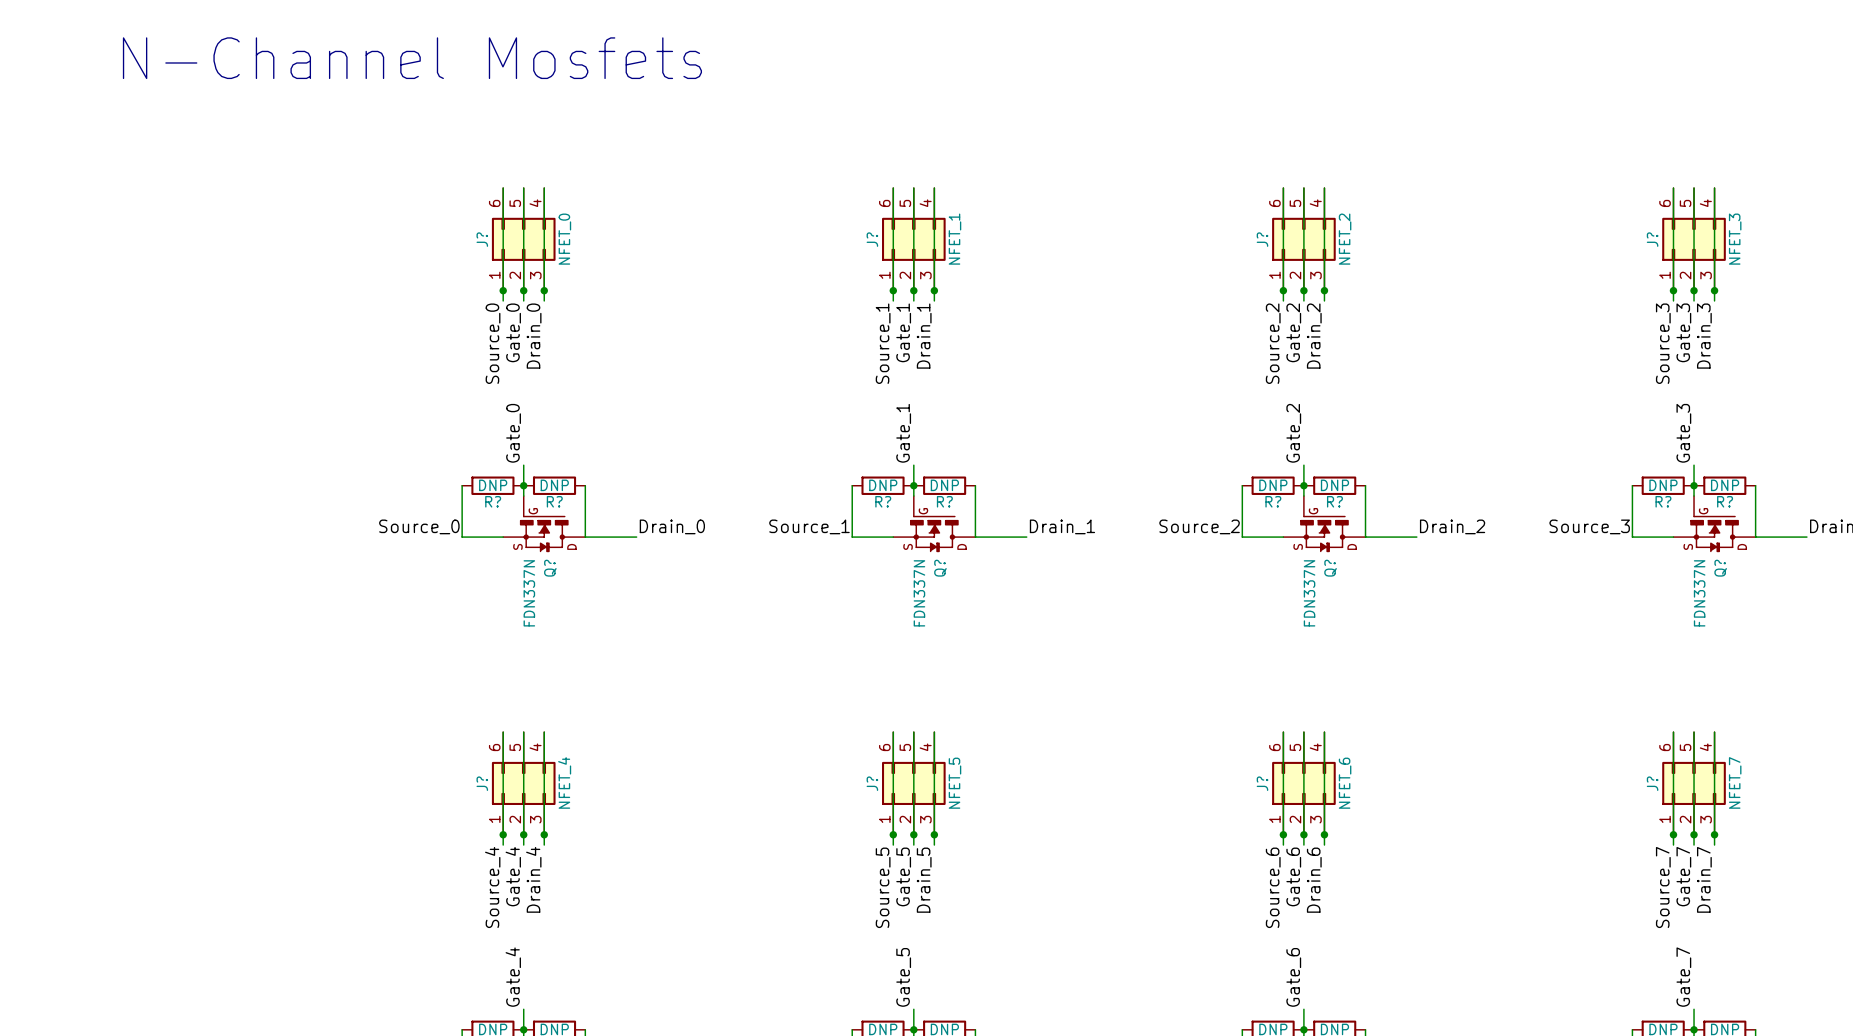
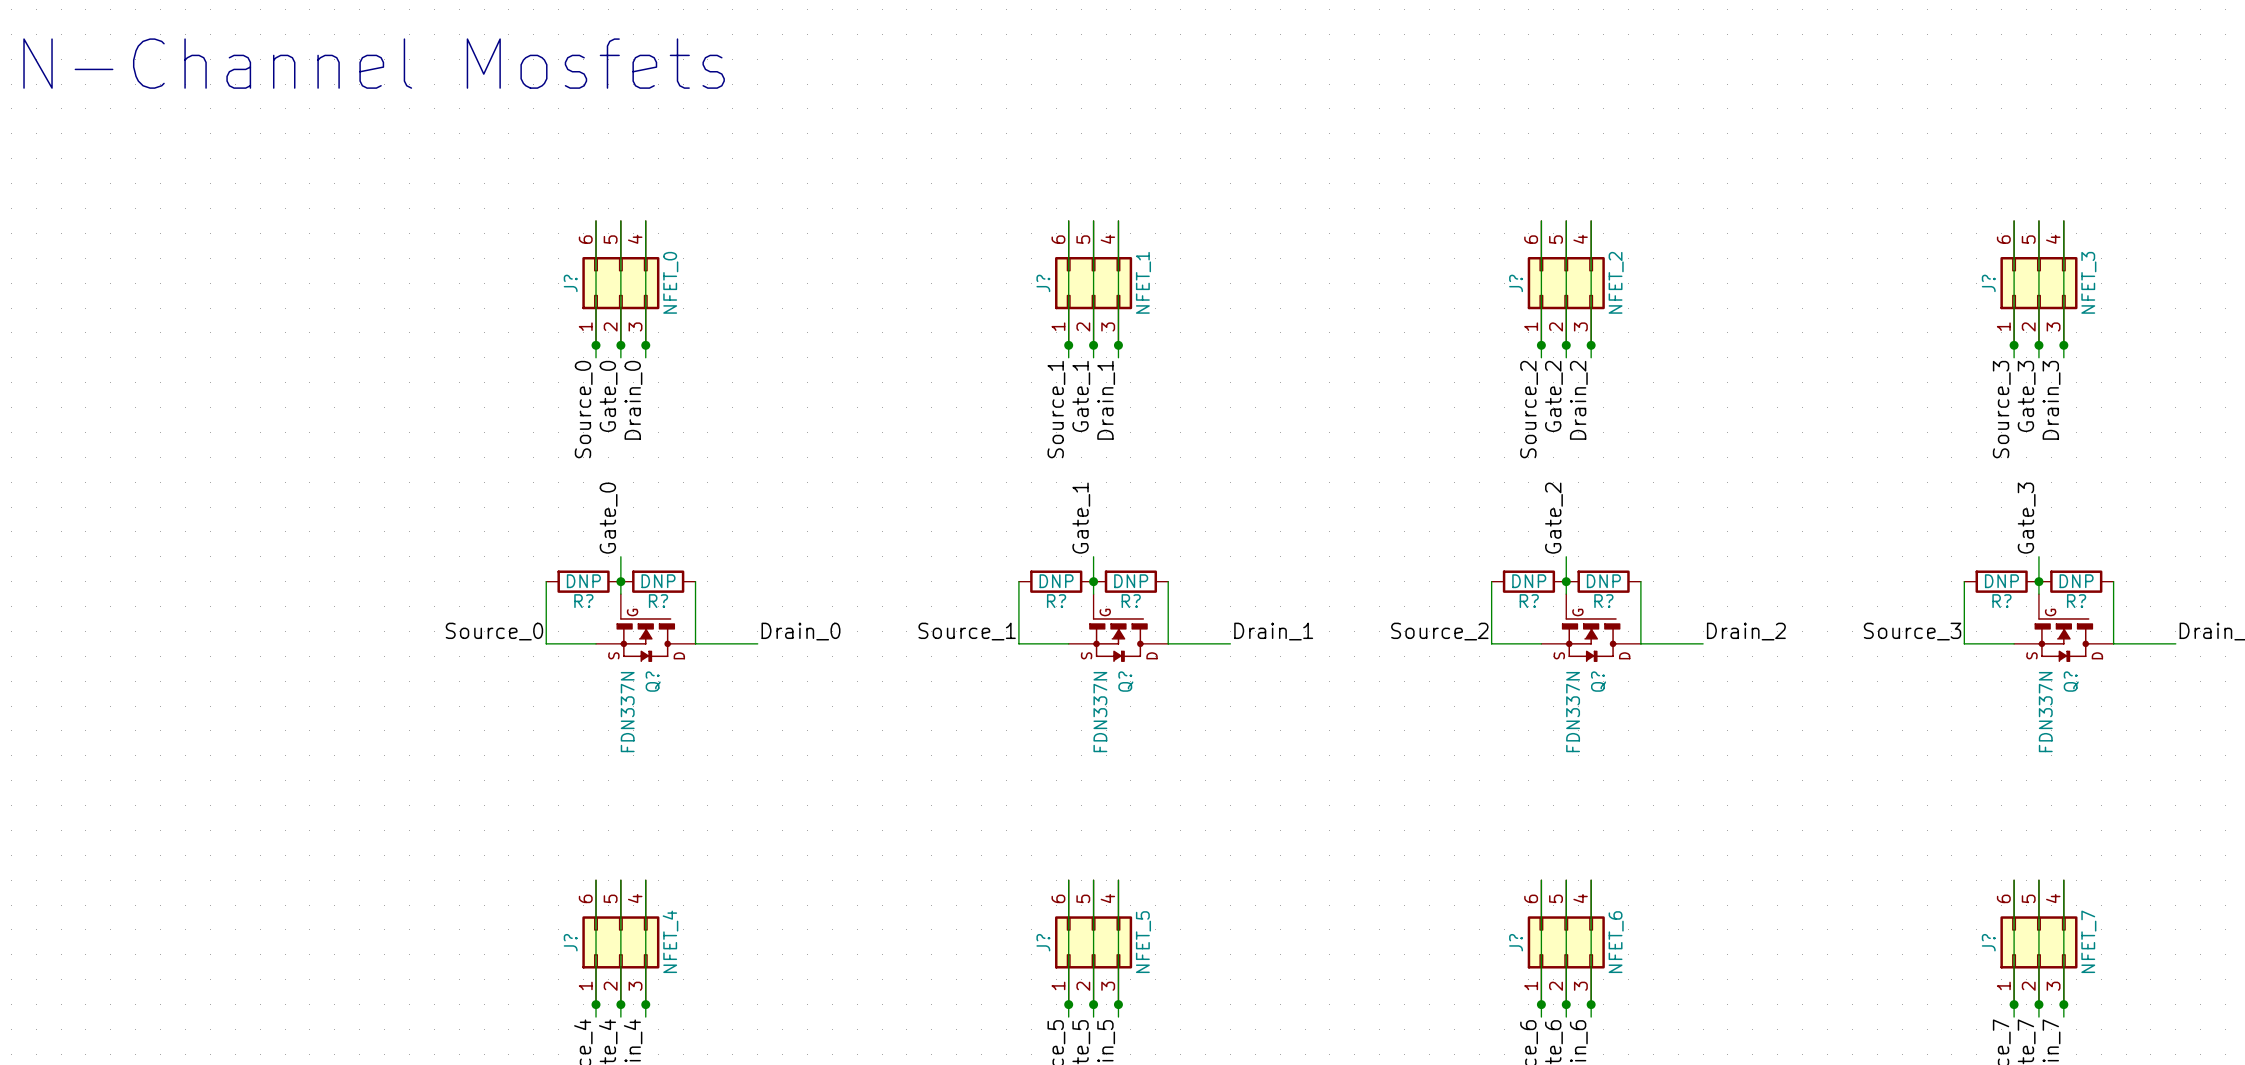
text position: N-Channel Mosfets (412, 58) -> N-Channel Mosfets (374, 63)

